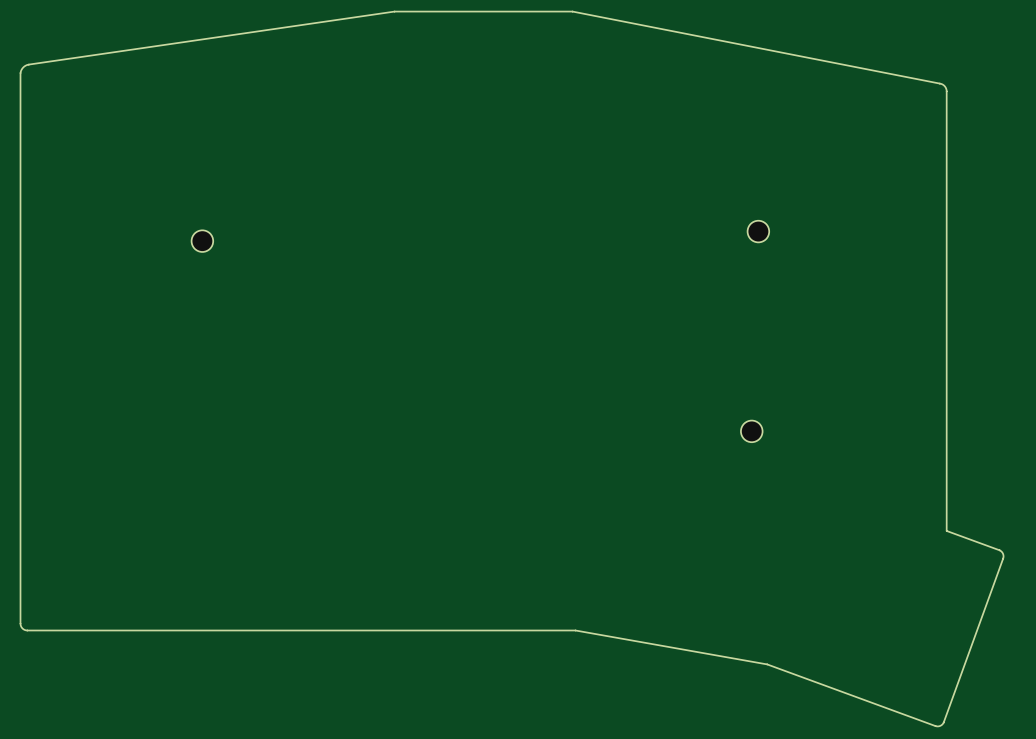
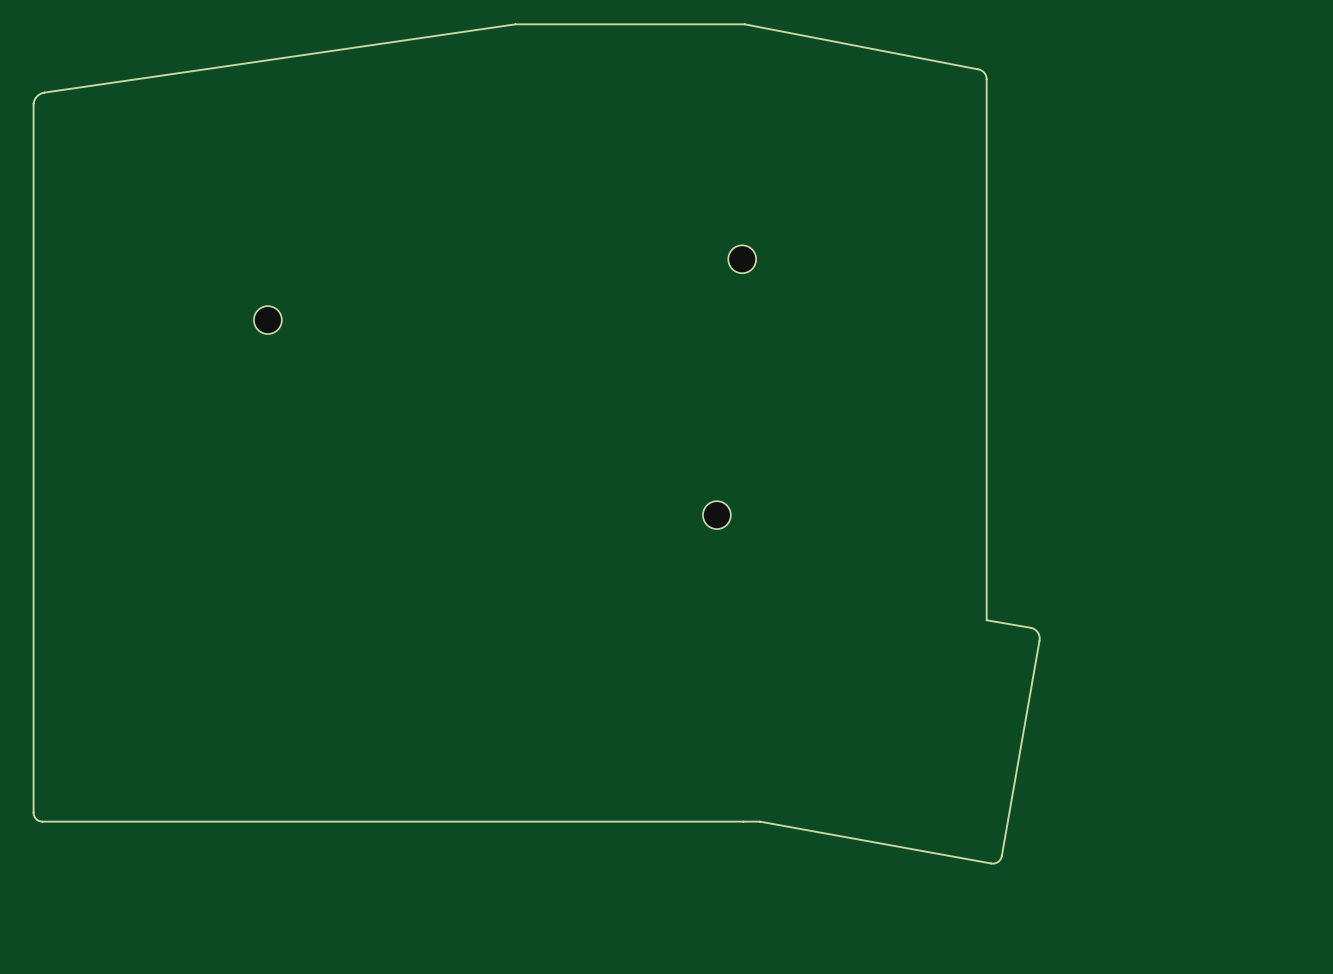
board edge: (572, 11) (940, 83) (944, 86) (946, 91) (946, 530) (999, 550) (1003, 556) (943, 722) (938, 726) (767, 664) (575, 630) -> (744, 24) (979, 69) (985, 74) (986, 620) (1032, 628) (1037, 631) (1039, 638) (1001, 855) (998, 861) (990, 863) (759, 821) (748, 821)
part: none -> (742, 259)
part: (758, 231) -> none
part: none -> (716, 515)
part: (751, 431) -> none

